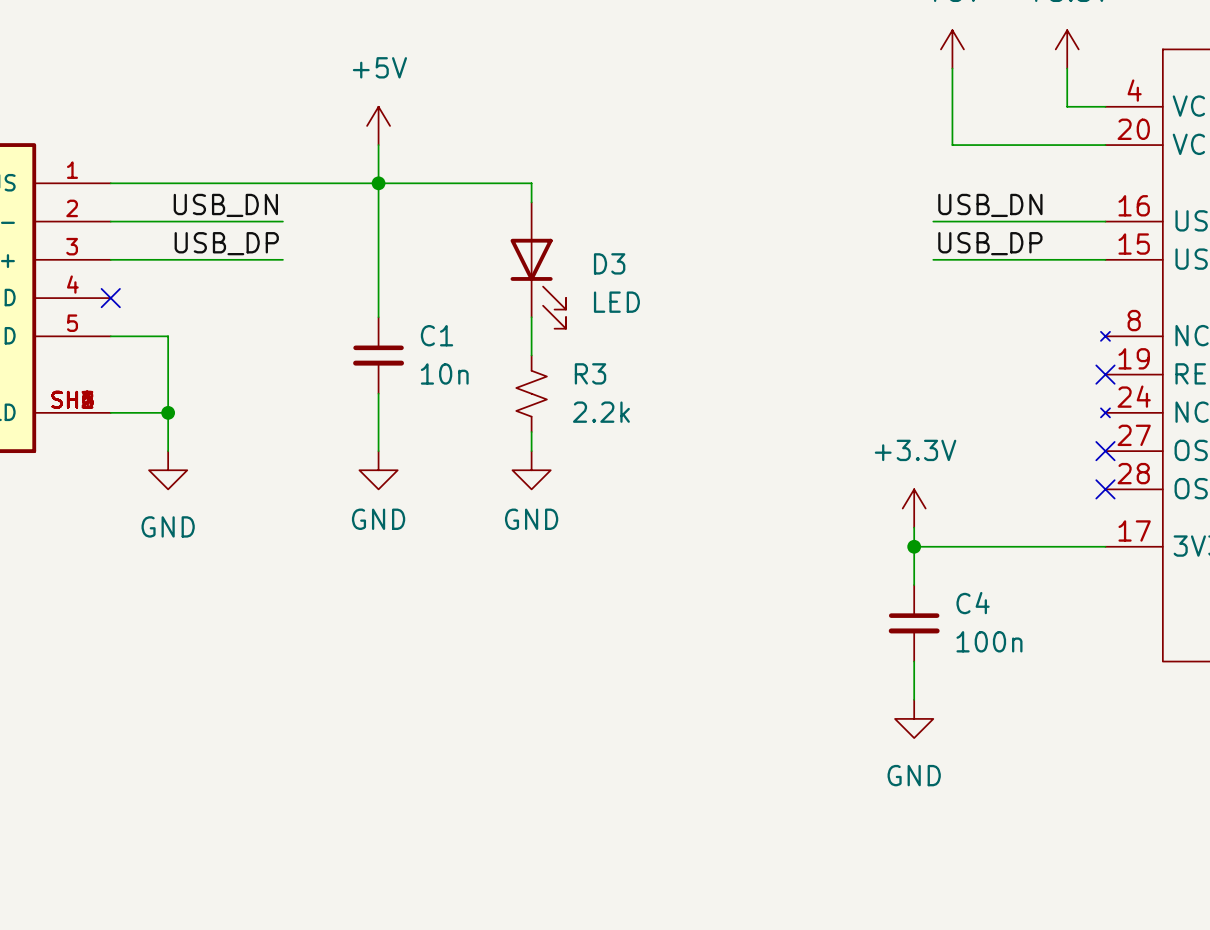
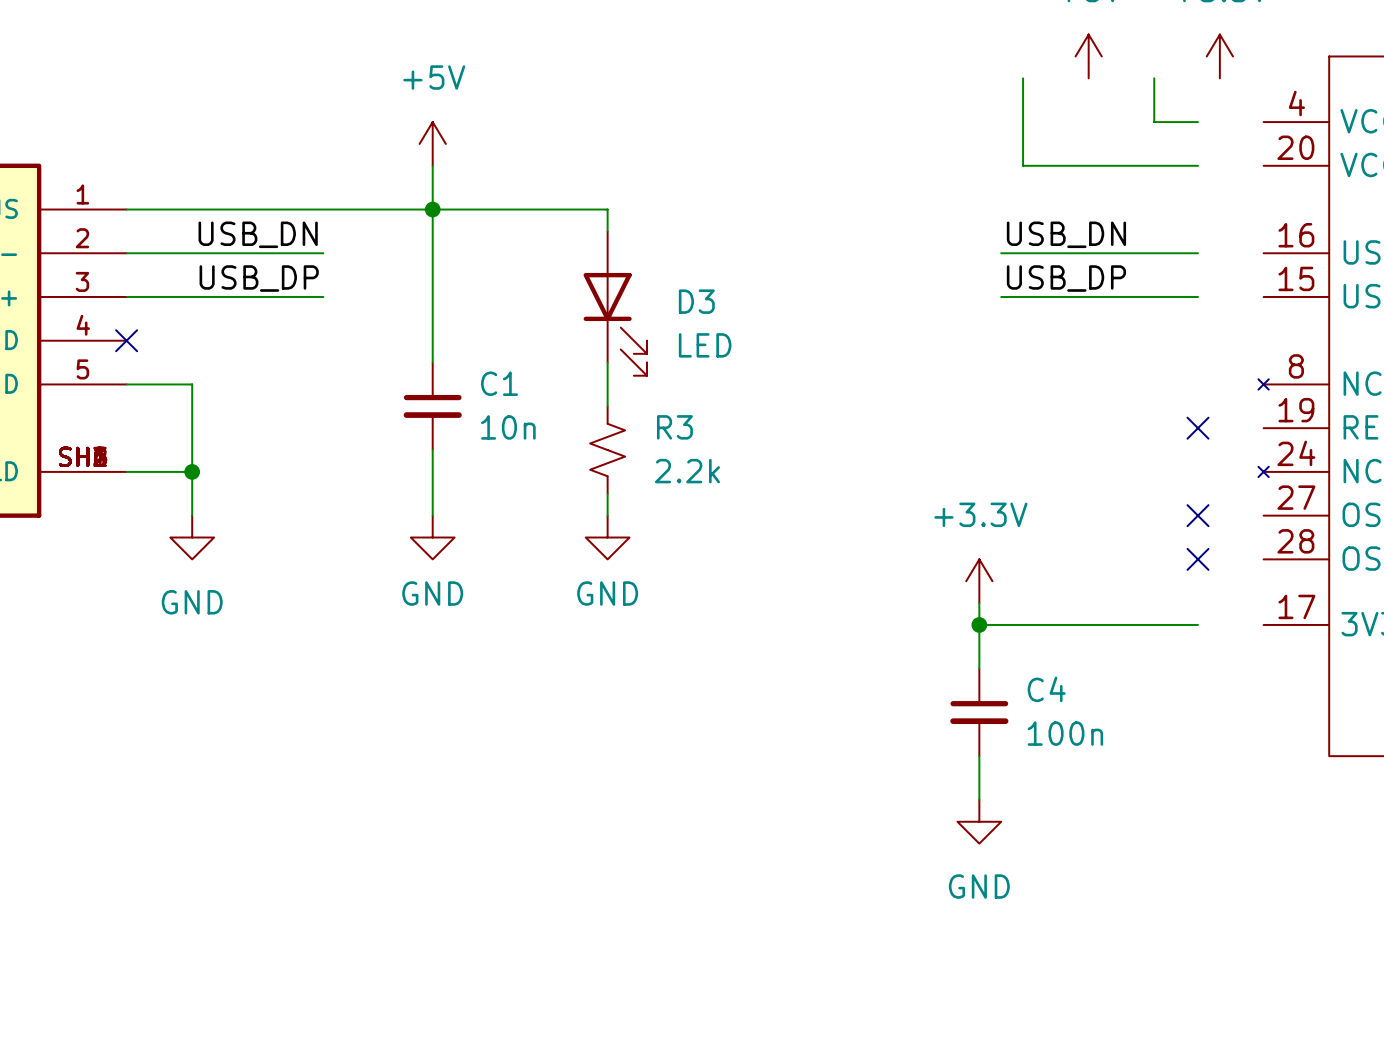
wire: (952, 68) (952, 145) -> (1023, 78) (1023, 165) (1088, 165)
wire: (1067, 68) (1067, 106) (1105, 106) -> (1154, 78) (1154, 122) (1198, 122)
wire: (1048, 145) (1105, 145) -> none
label position: USB_DN (990, 205) -> USB_DN (1066, 234)
wire: (1048, 221) (1105, 221) -> (1001, 253) (1066, 253)
label position: USB_DP (990, 243) -> USB_DP (1066, 278)
wire: (1048, 259) (1105, 259) -> (1001, 296) (1066, 296)
no-connect mark: none -> (1198, 428)
no-connect mark: (1105, 374) -> none
no-connect mark: none -> (1198, 515)
no-connect mark: (1105, 451) -> none
no-connect mark: none -> (1198, 559)
no-connect mark: (1105, 489) -> none
power symbol position: +3.3V (914, 508) -> +3.3V (979, 581)
wire: (914, 527) (914, 585) -> (979, 603) (979, 668)
junction position: (914, 546) -> (979, 624)
wire: (1048, 546) (1105, 546) -> (979, 624) (1044, 624)
C4 position: (914, 623) -> (979, 712)
wire: (914, 661) (914, 699) -> (979, 756) (979, 799)
power symbol position: GND (914, 718) -> GND (979, 821)

